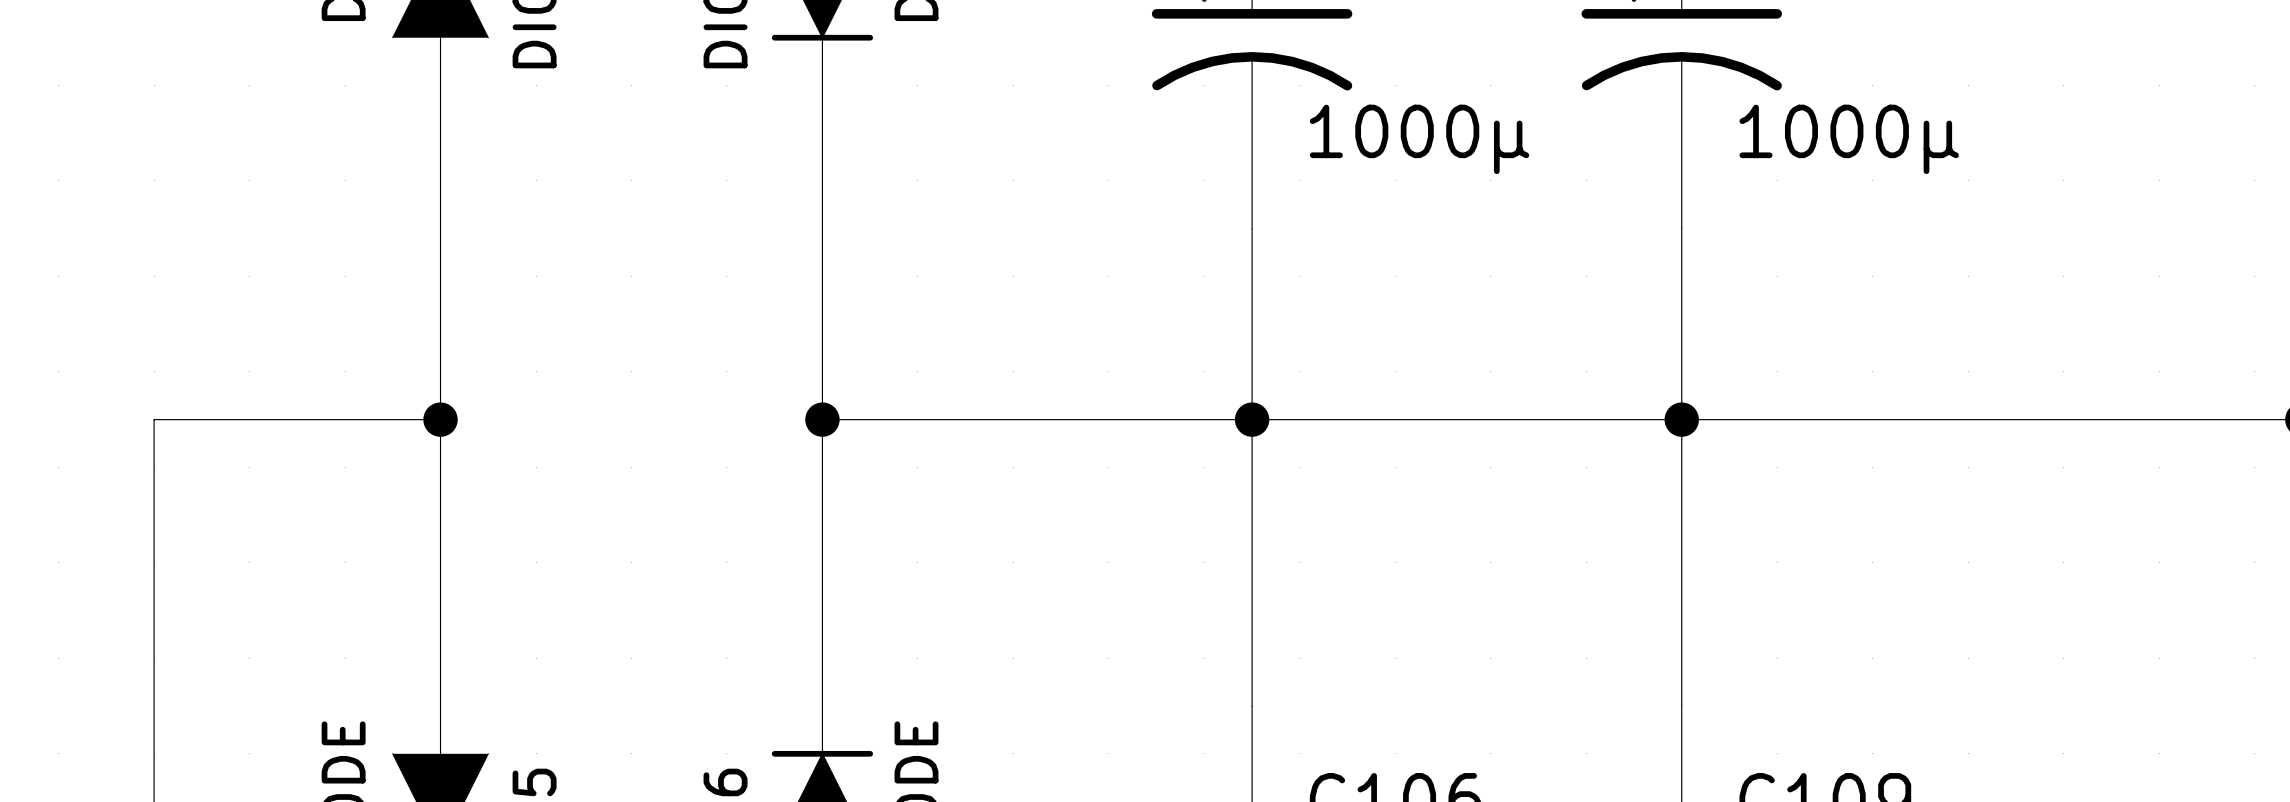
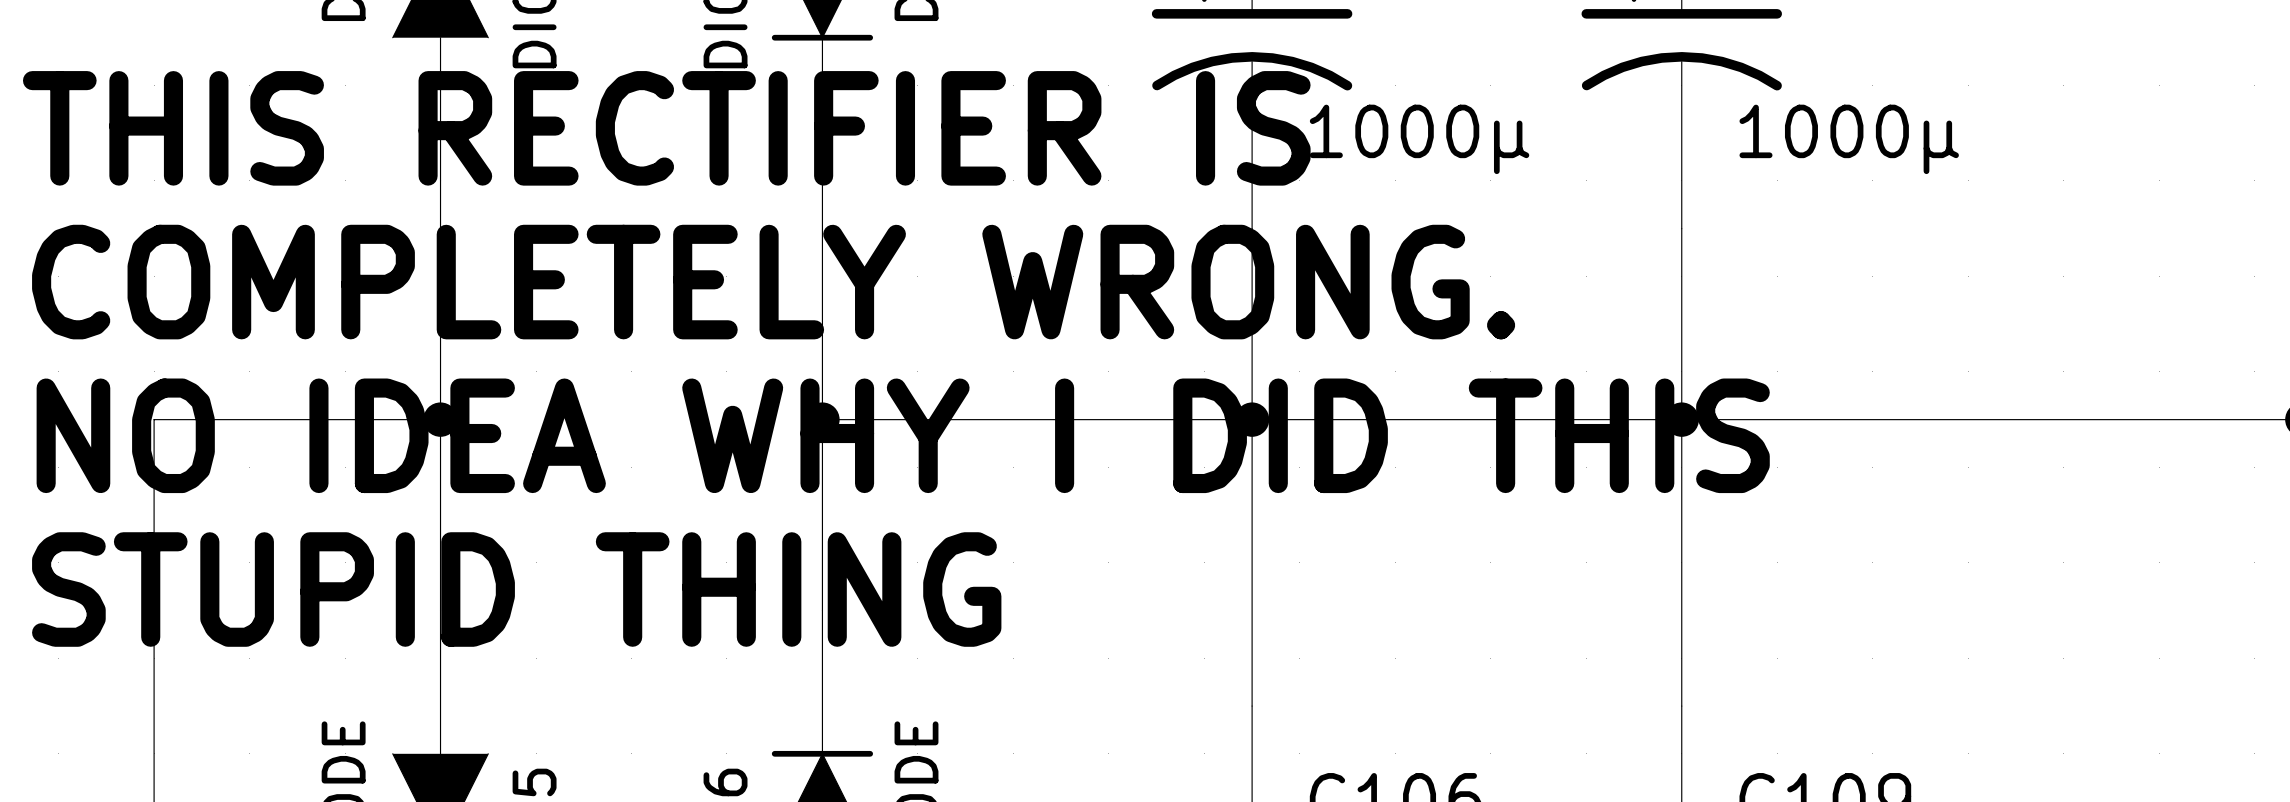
text: none -> THIS RECTIFIER IS (666, 128)
text: none -> COMPLETELY WRONG. (773, 282)
text: none -> NO IDEA WHY I DID THIS (903, 435)
text: none -> STUPID THING (516, 589)

